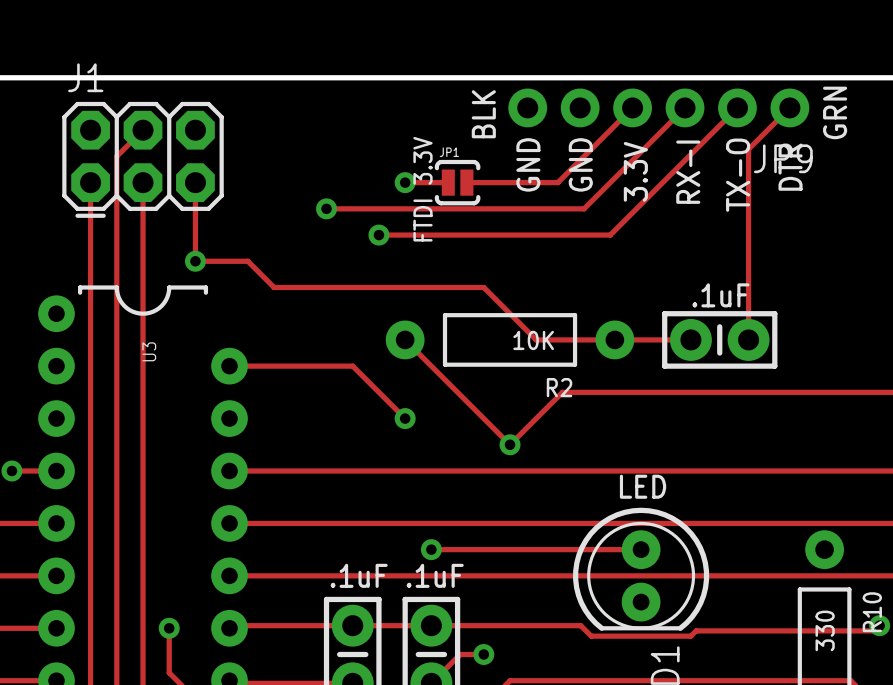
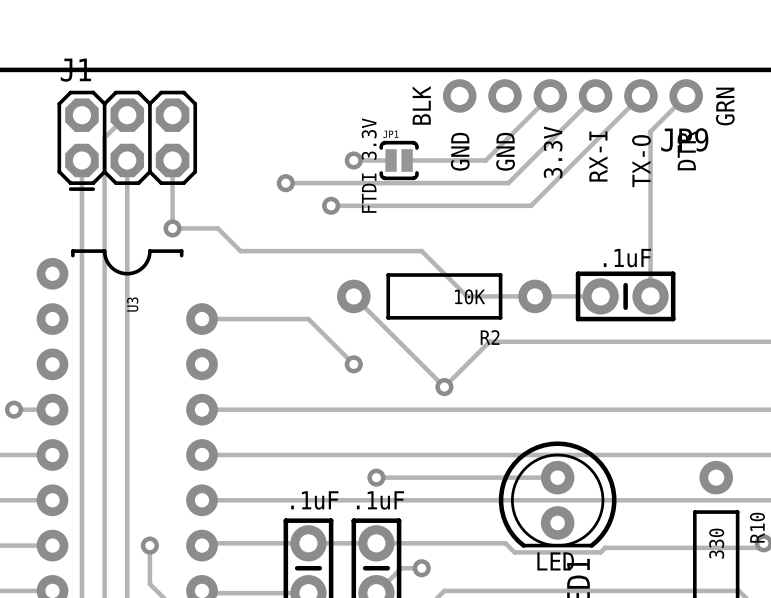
text position: LED (643, 486) -> LED (555, 561)

